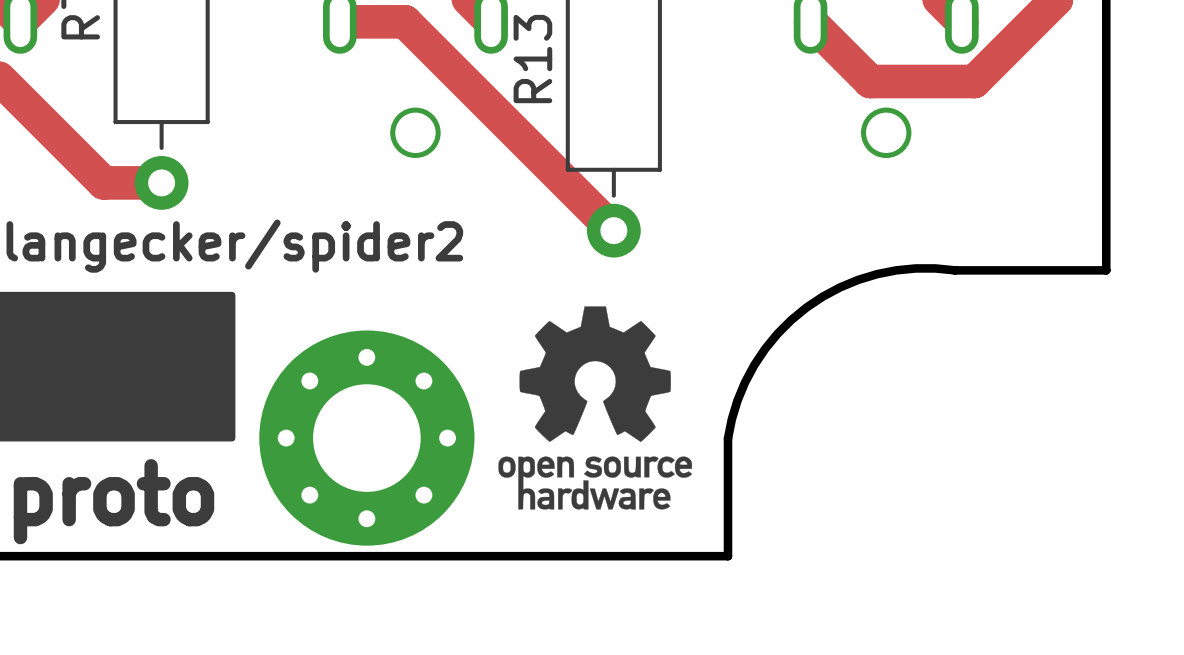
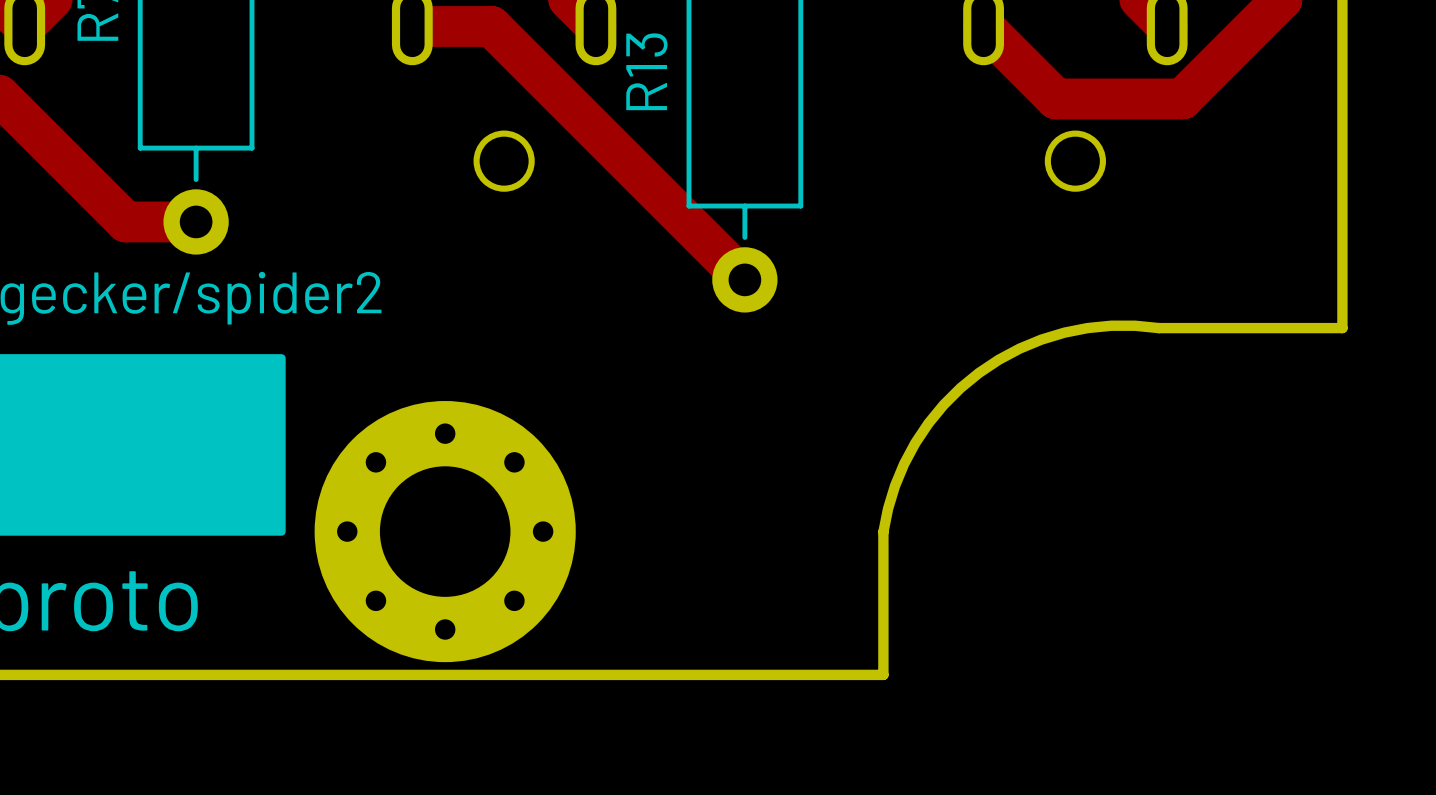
drawing: [498, 306, 693, 510] -> none

